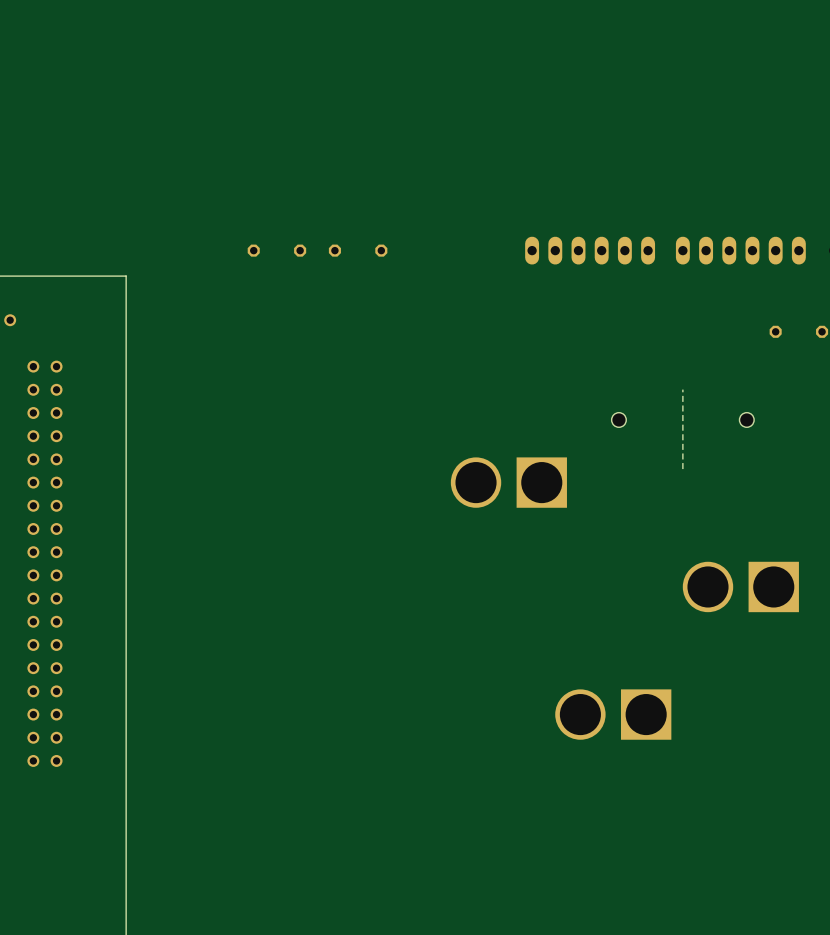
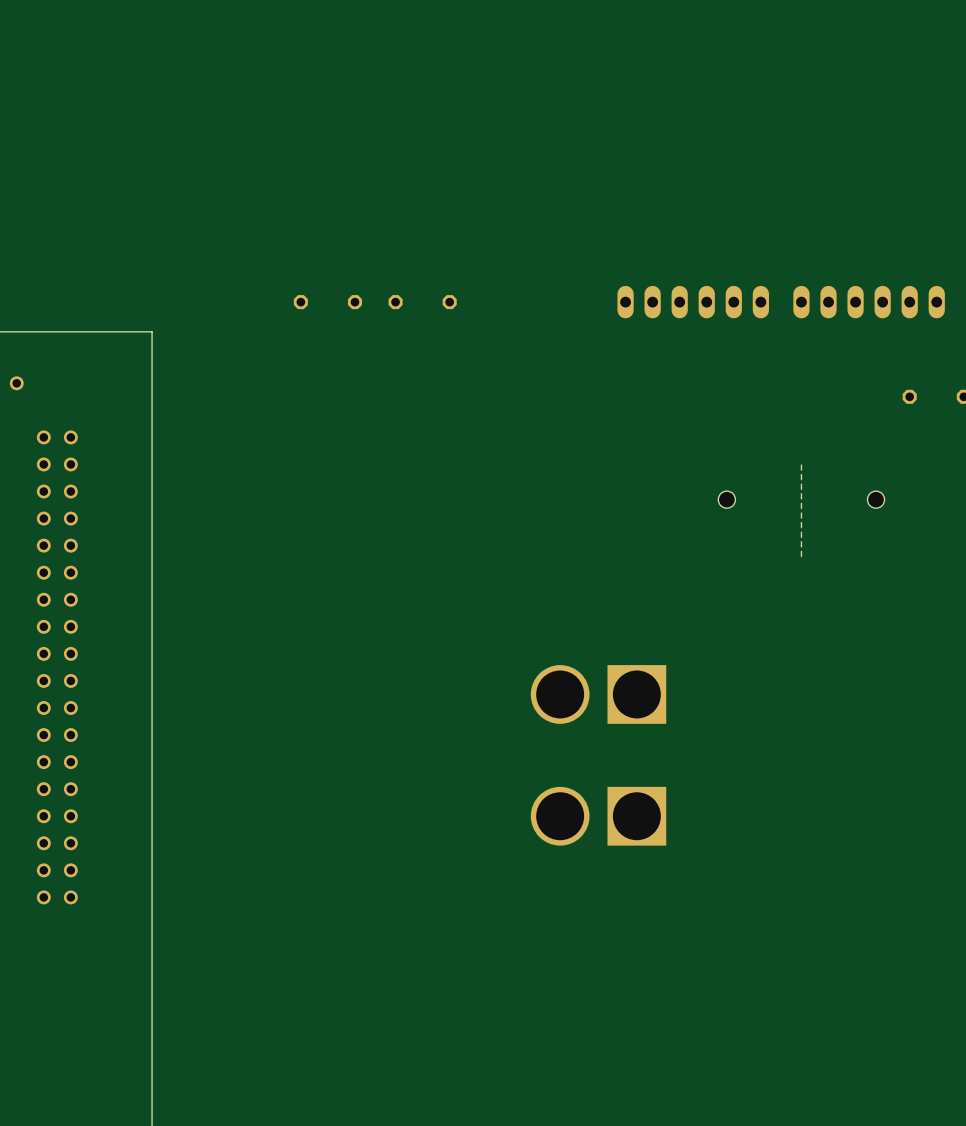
part: (508, 482) -> none
part: none -> (598, 694)
part: (740, 586) -> none
part: none -> (598, 816)
part: (613, 714) -> none

